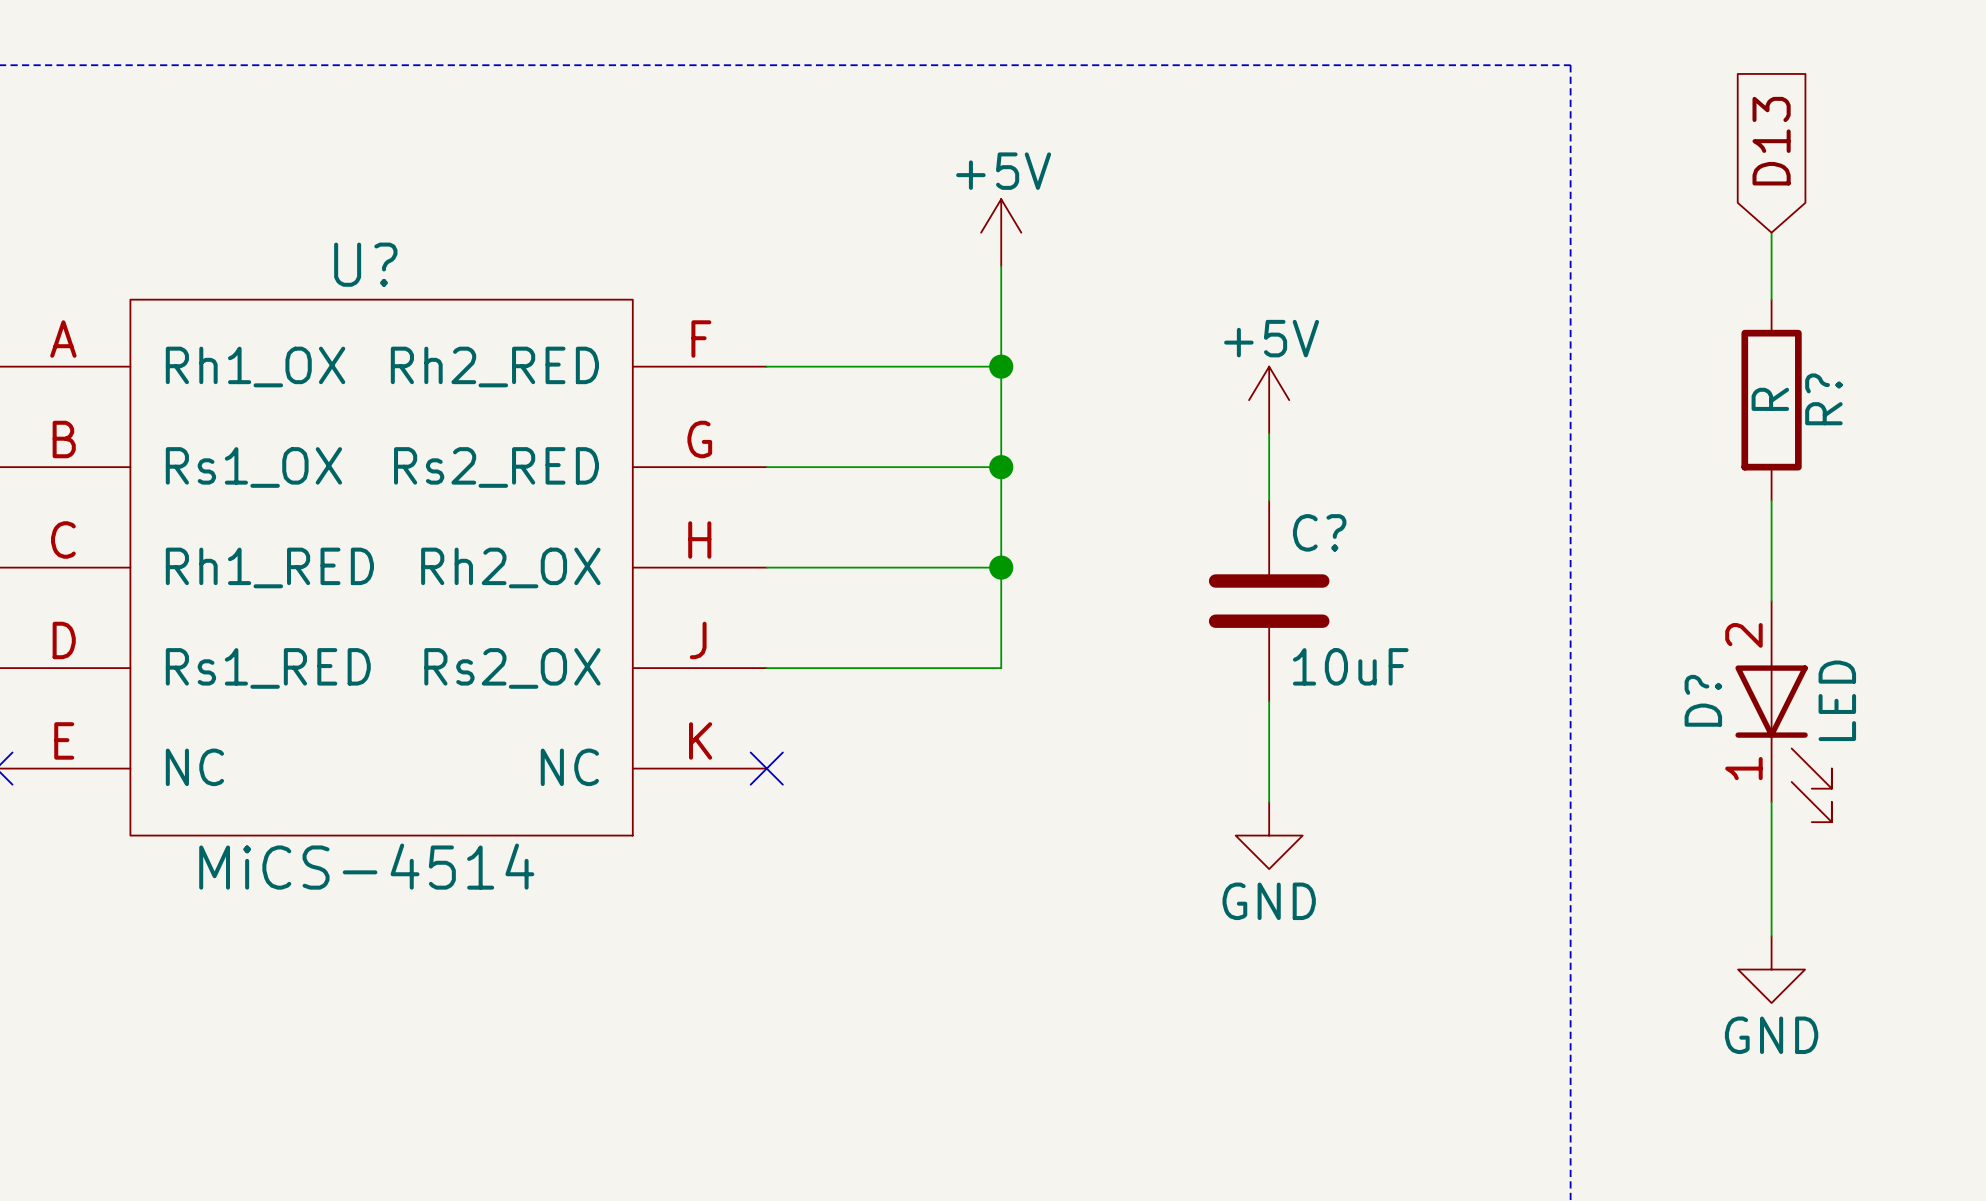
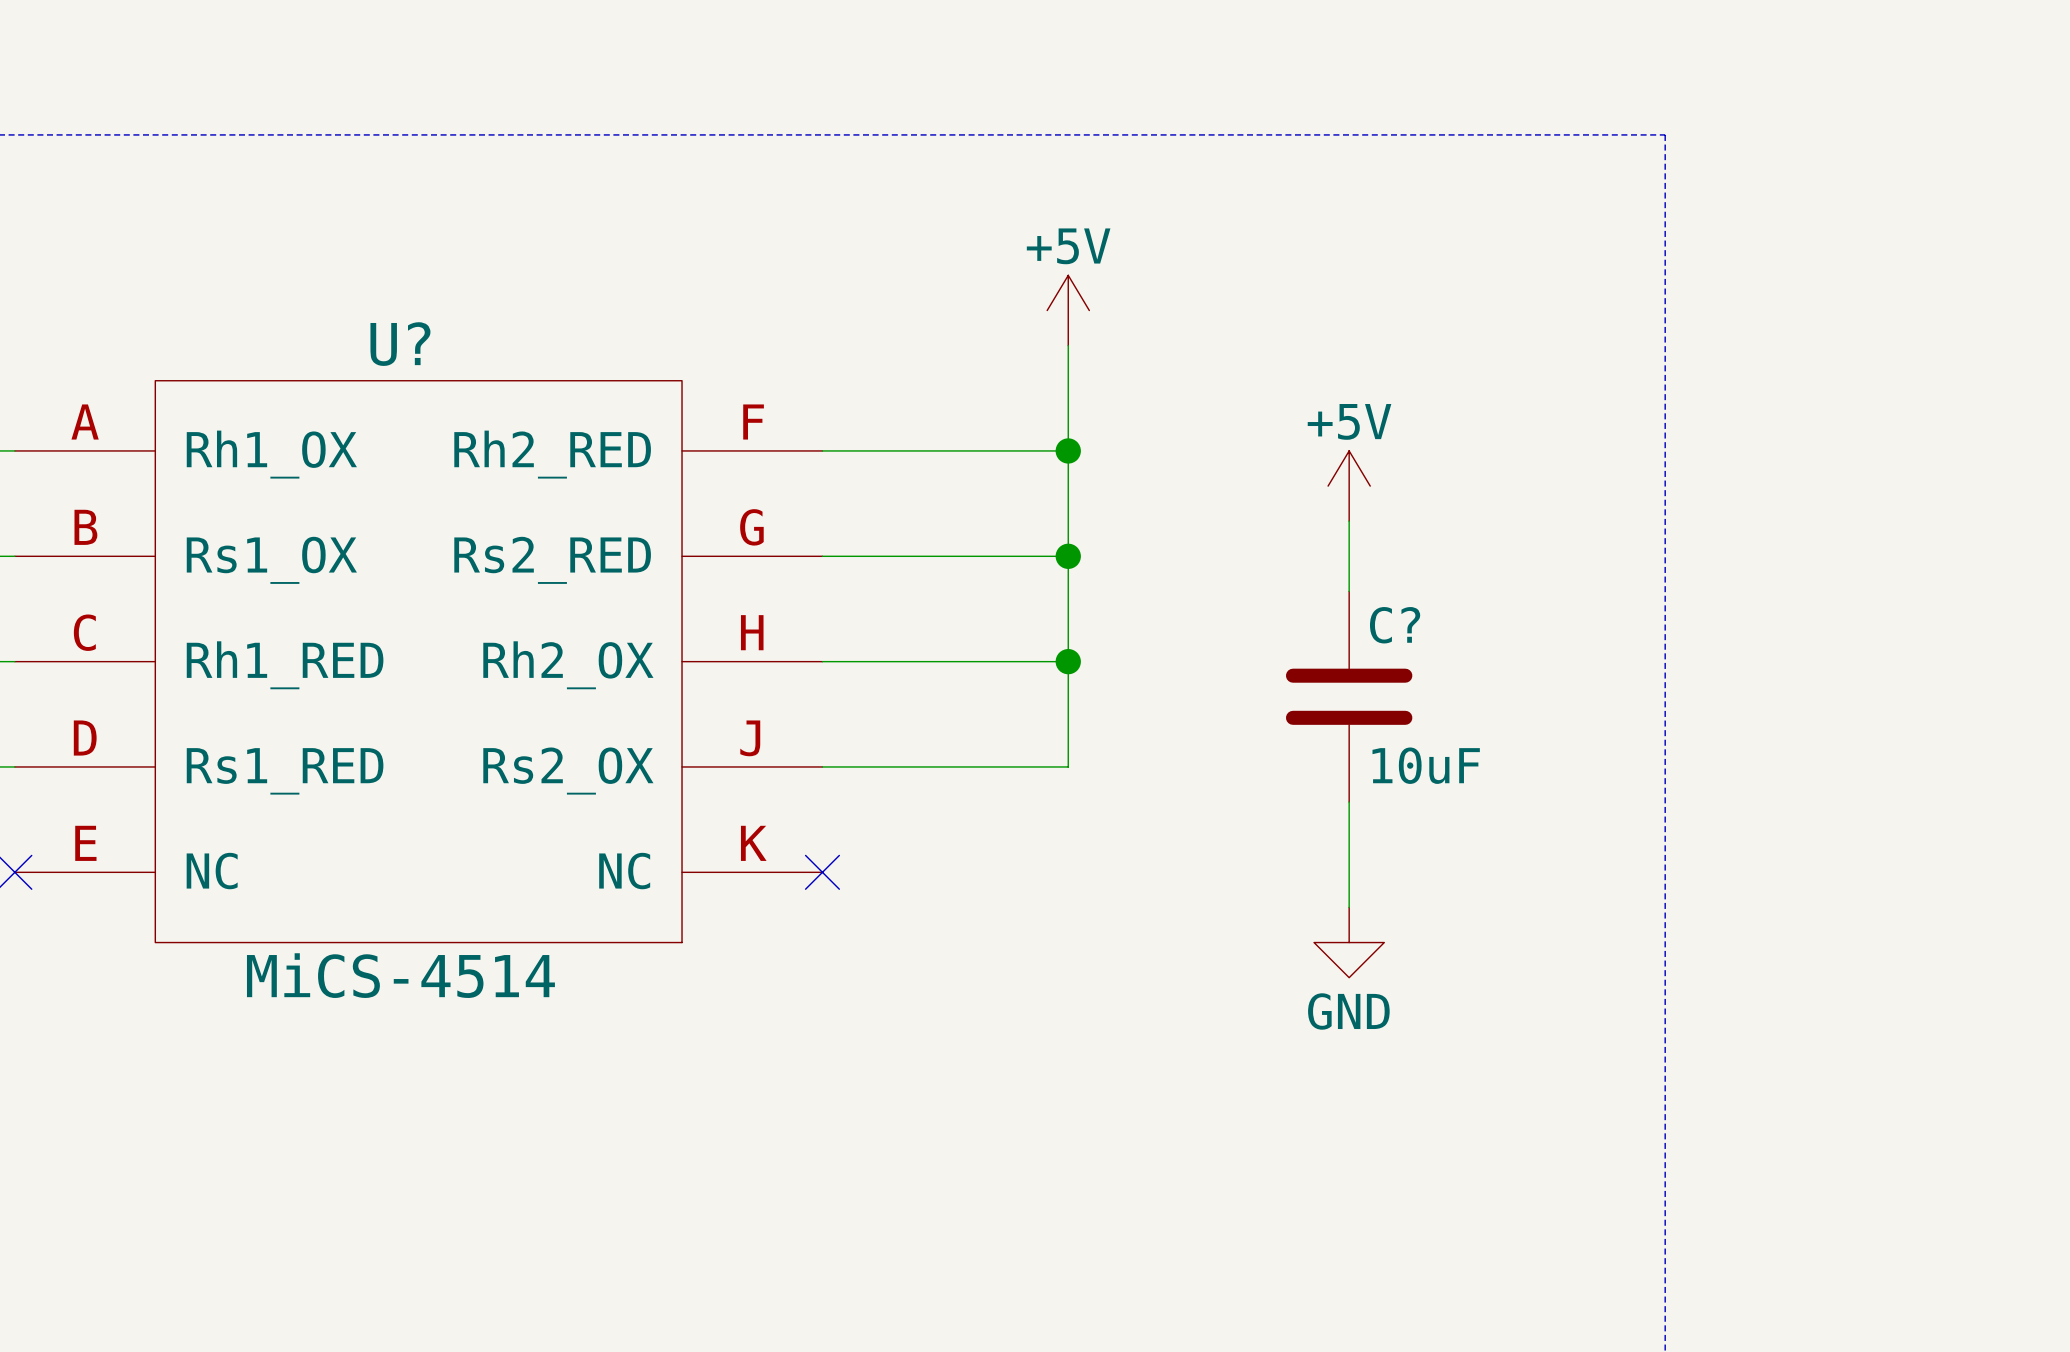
global label: D13 (1771, 141) -> none
wire: (1771, 232) (1771, 299) -> none
R?: R (1771, 400) -> none
wire: (1771, 500) (1771, 601) -> none
D?: LED (1783, 711) -> none
wire: (1771, 802) (1771, 936) -> none
power symbol: GND (1771, 969) -> none

